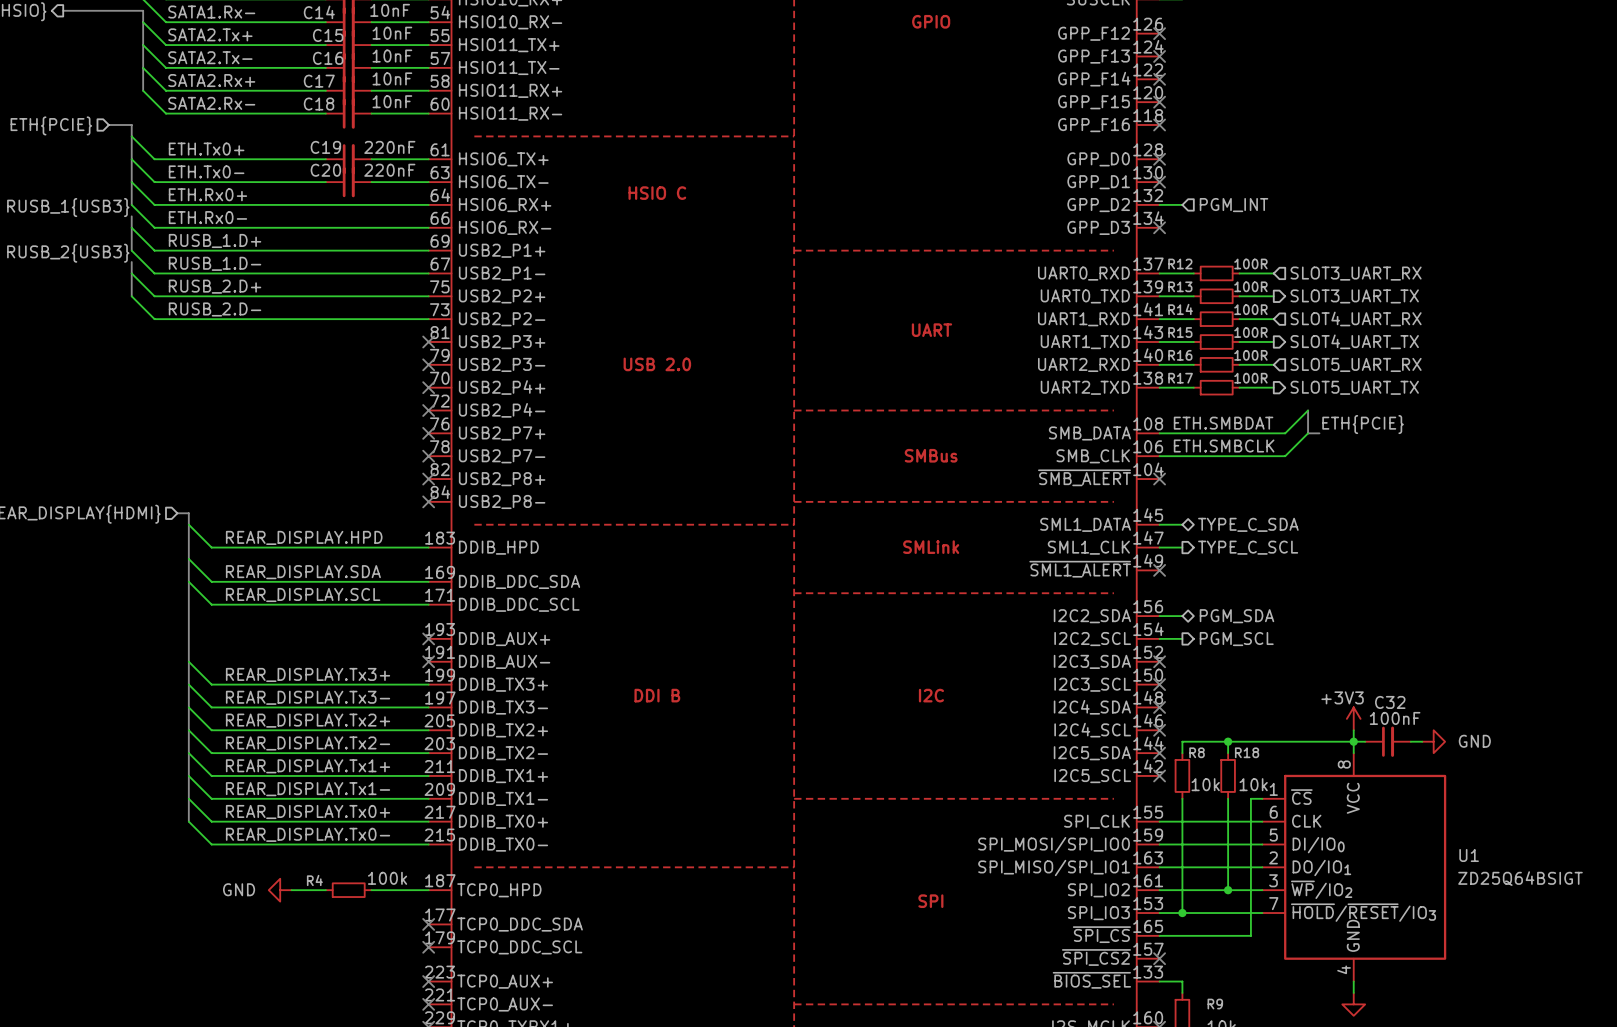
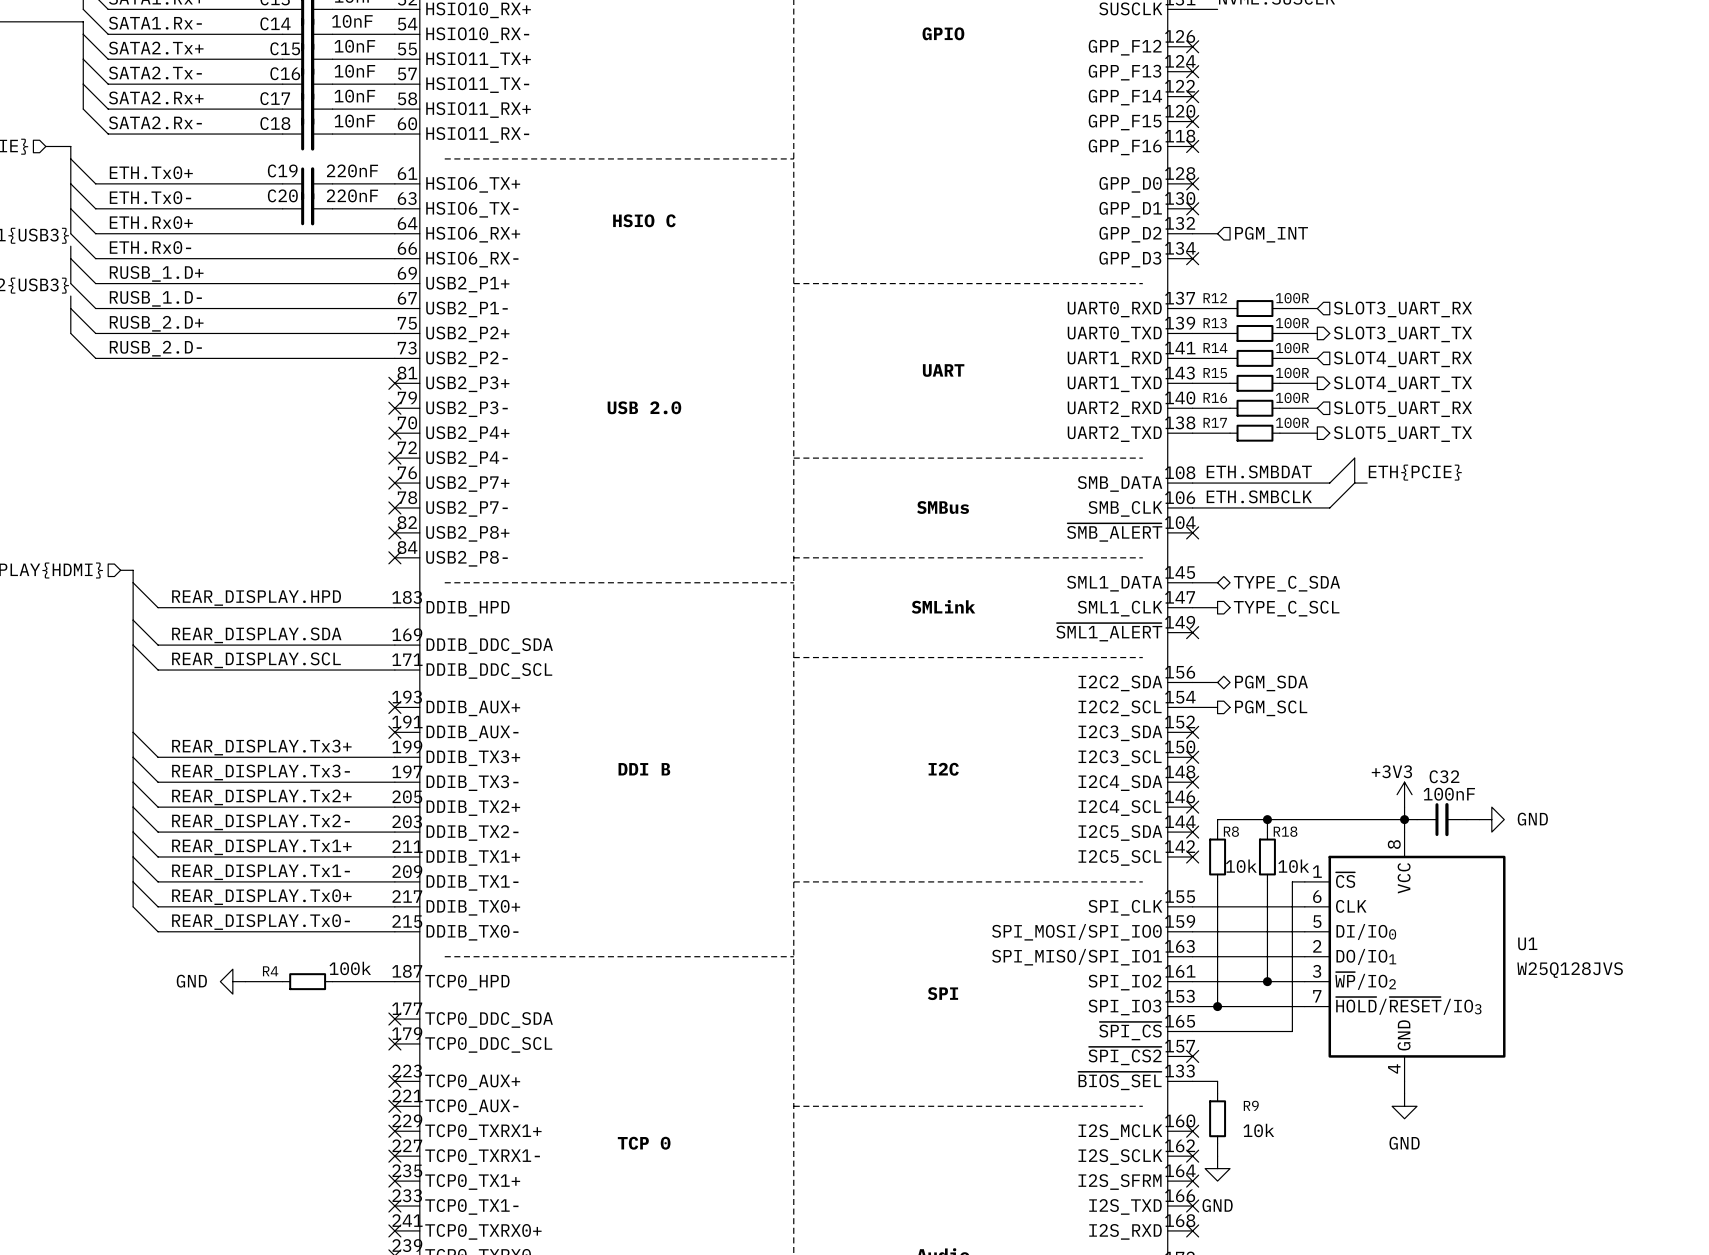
U1 value: ZD25Q64BSIGT (1520, 878) -> W25Q128JVS (1570, 970)

